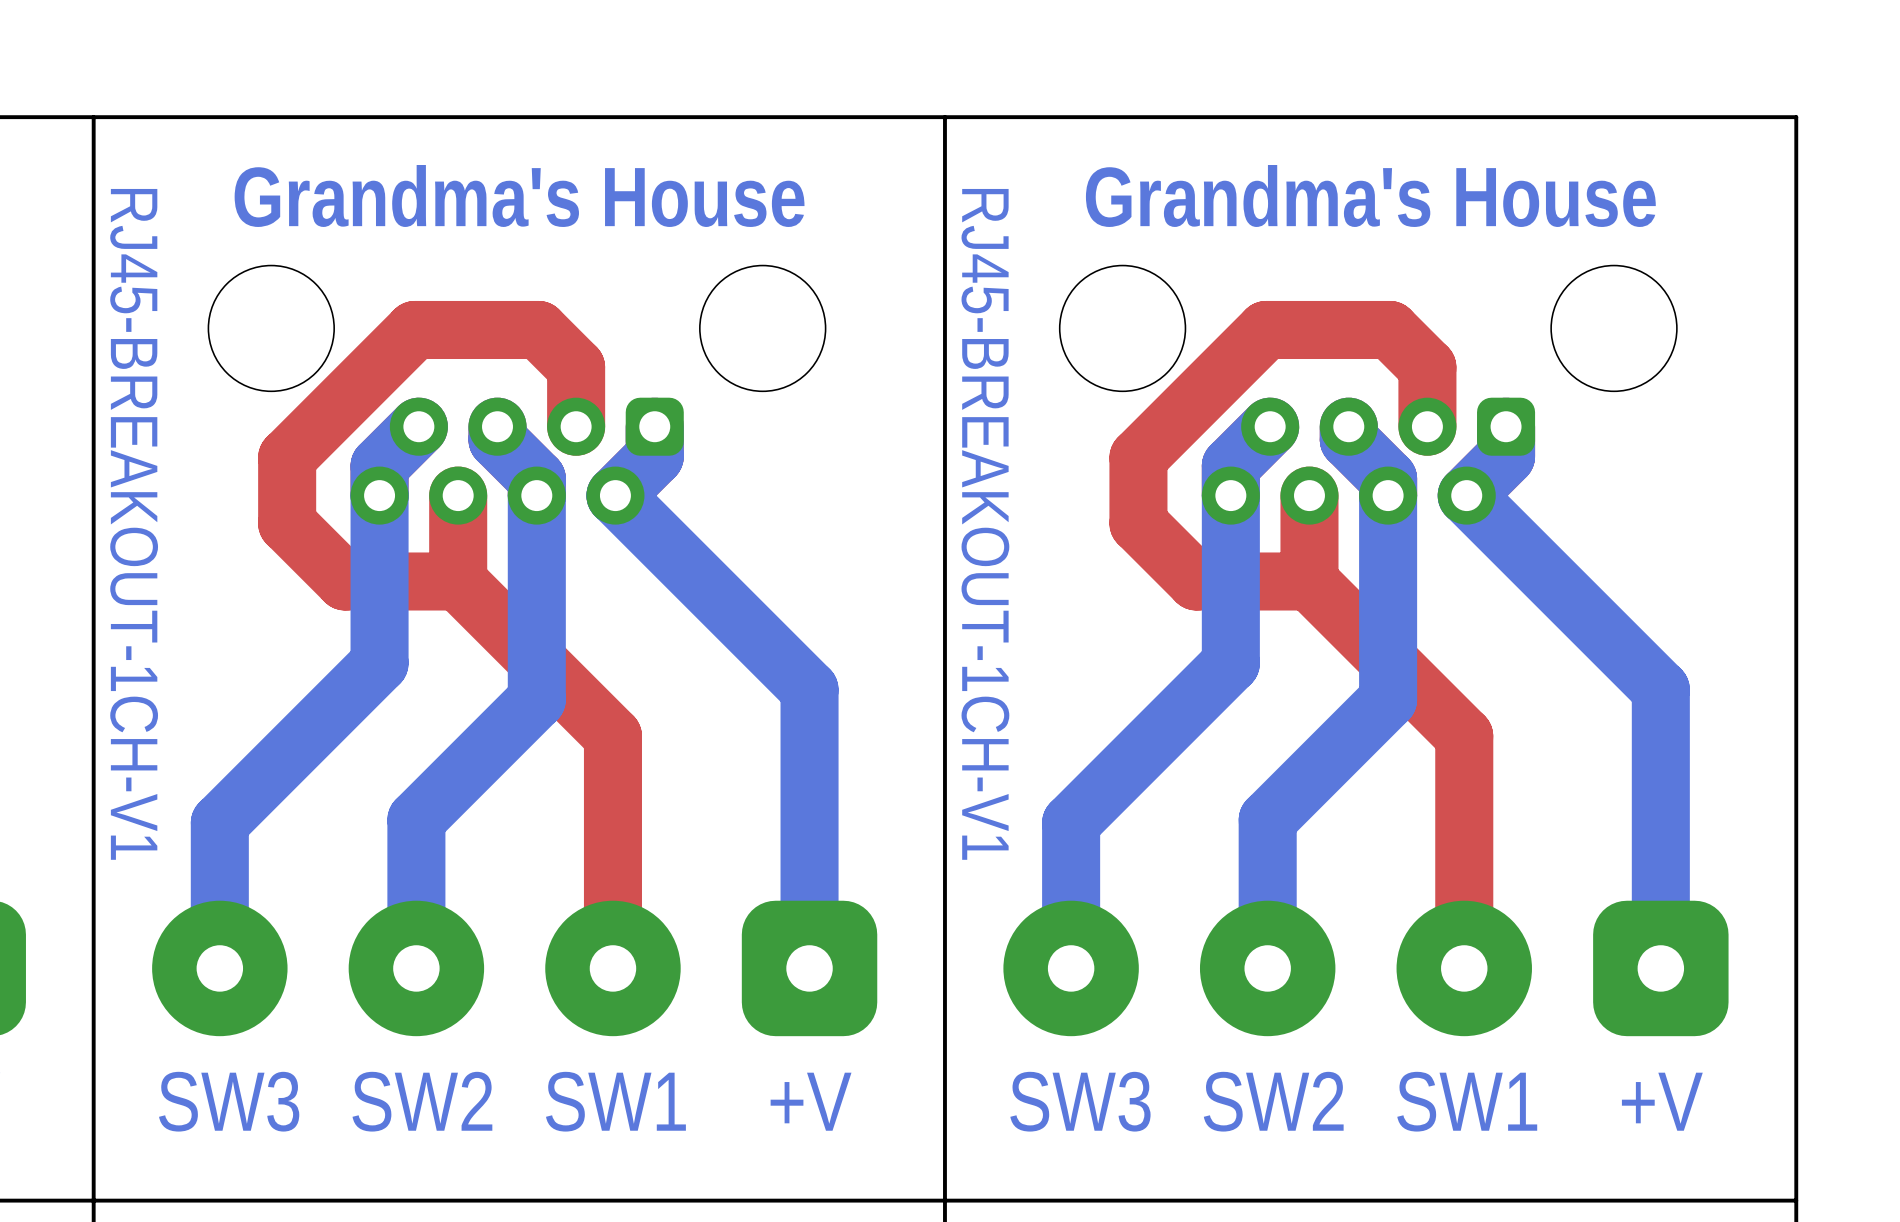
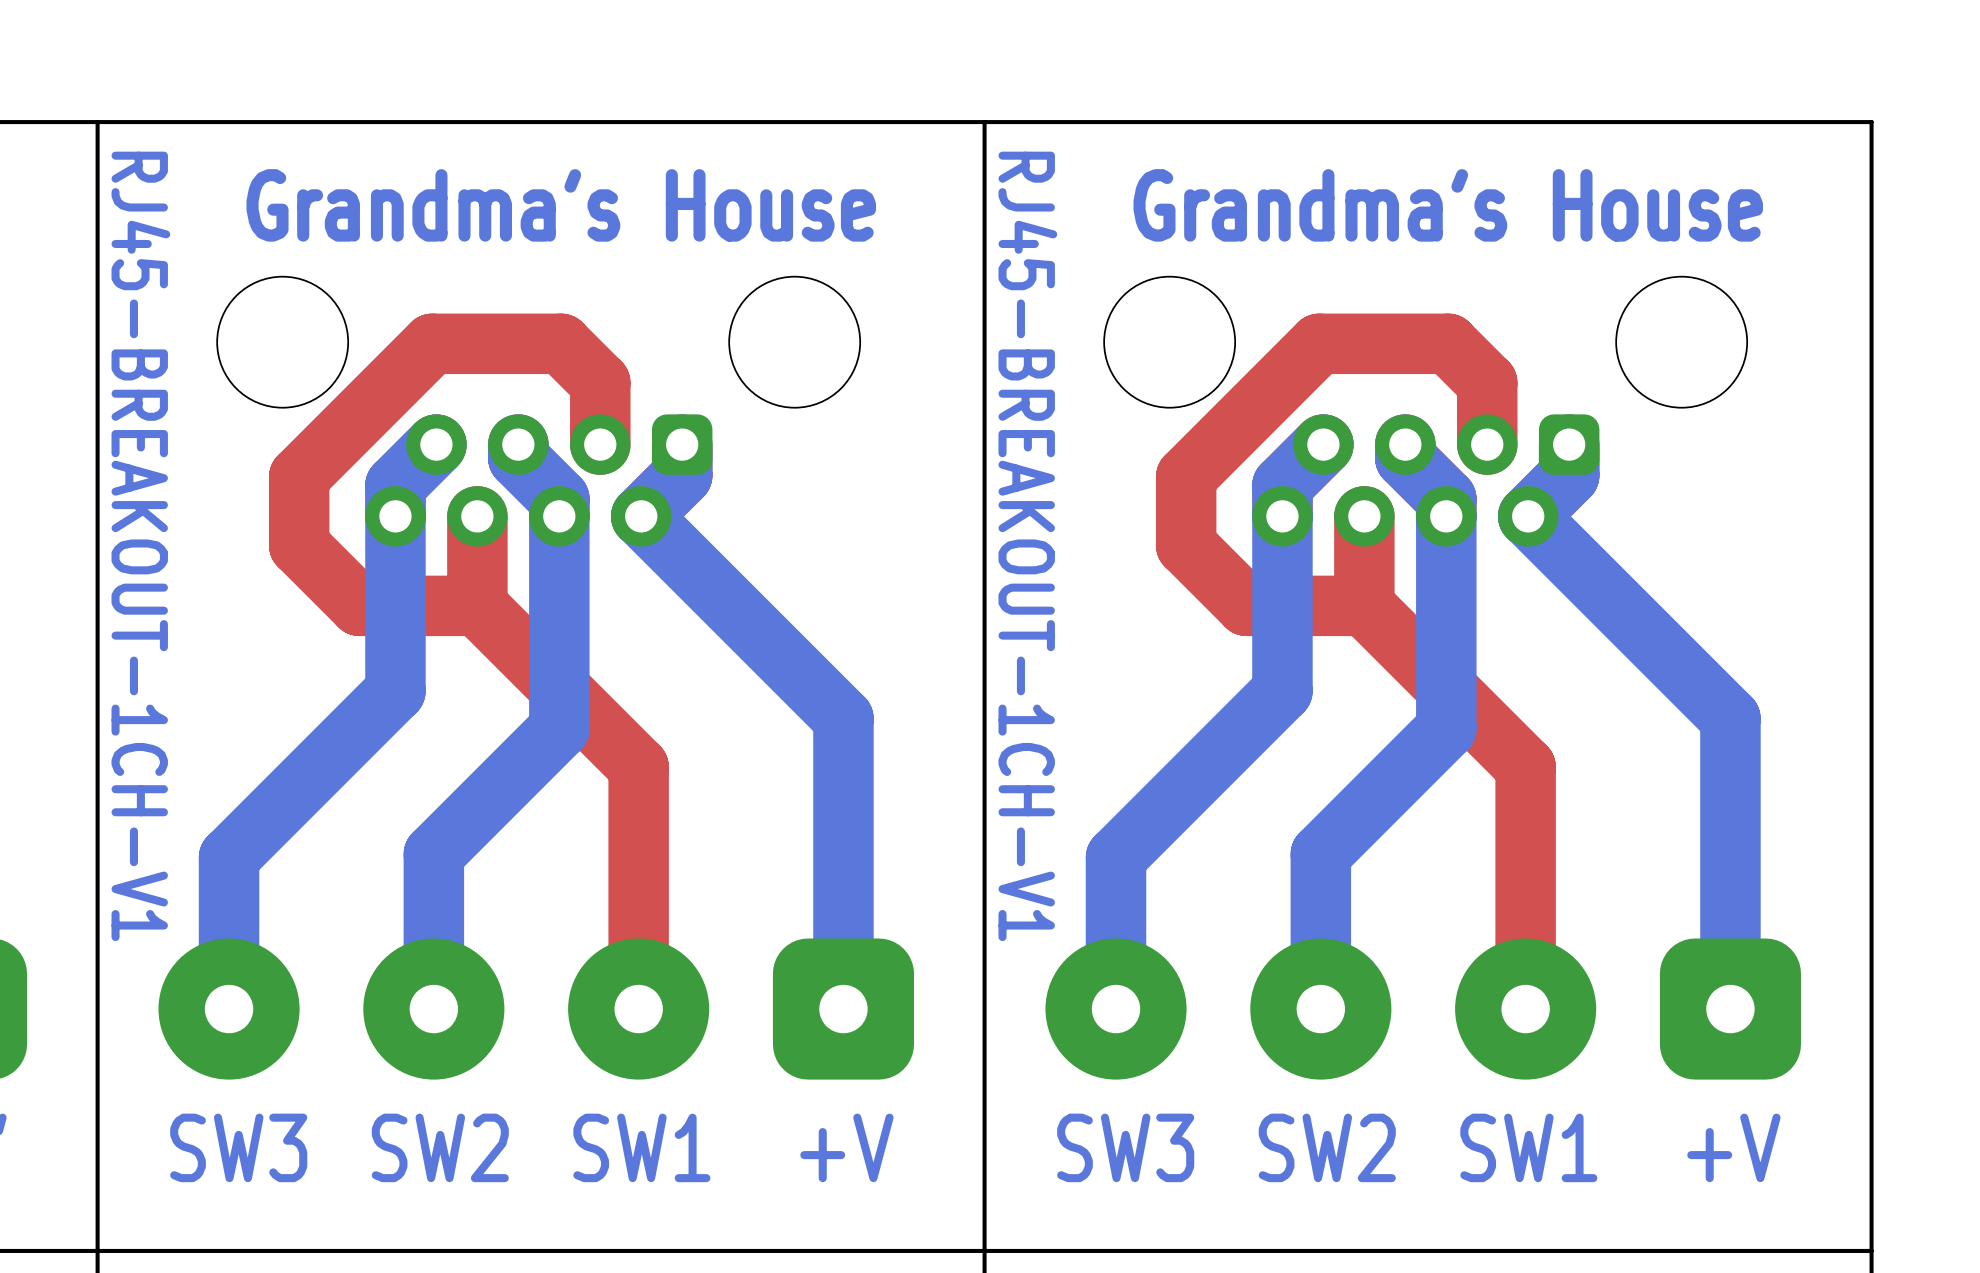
text position: Grandma's House (519, 195) -> Grandma's House (561, 205)
text position: Grandma's House (1370, 195) -> Grandma's House (1448, 205)

